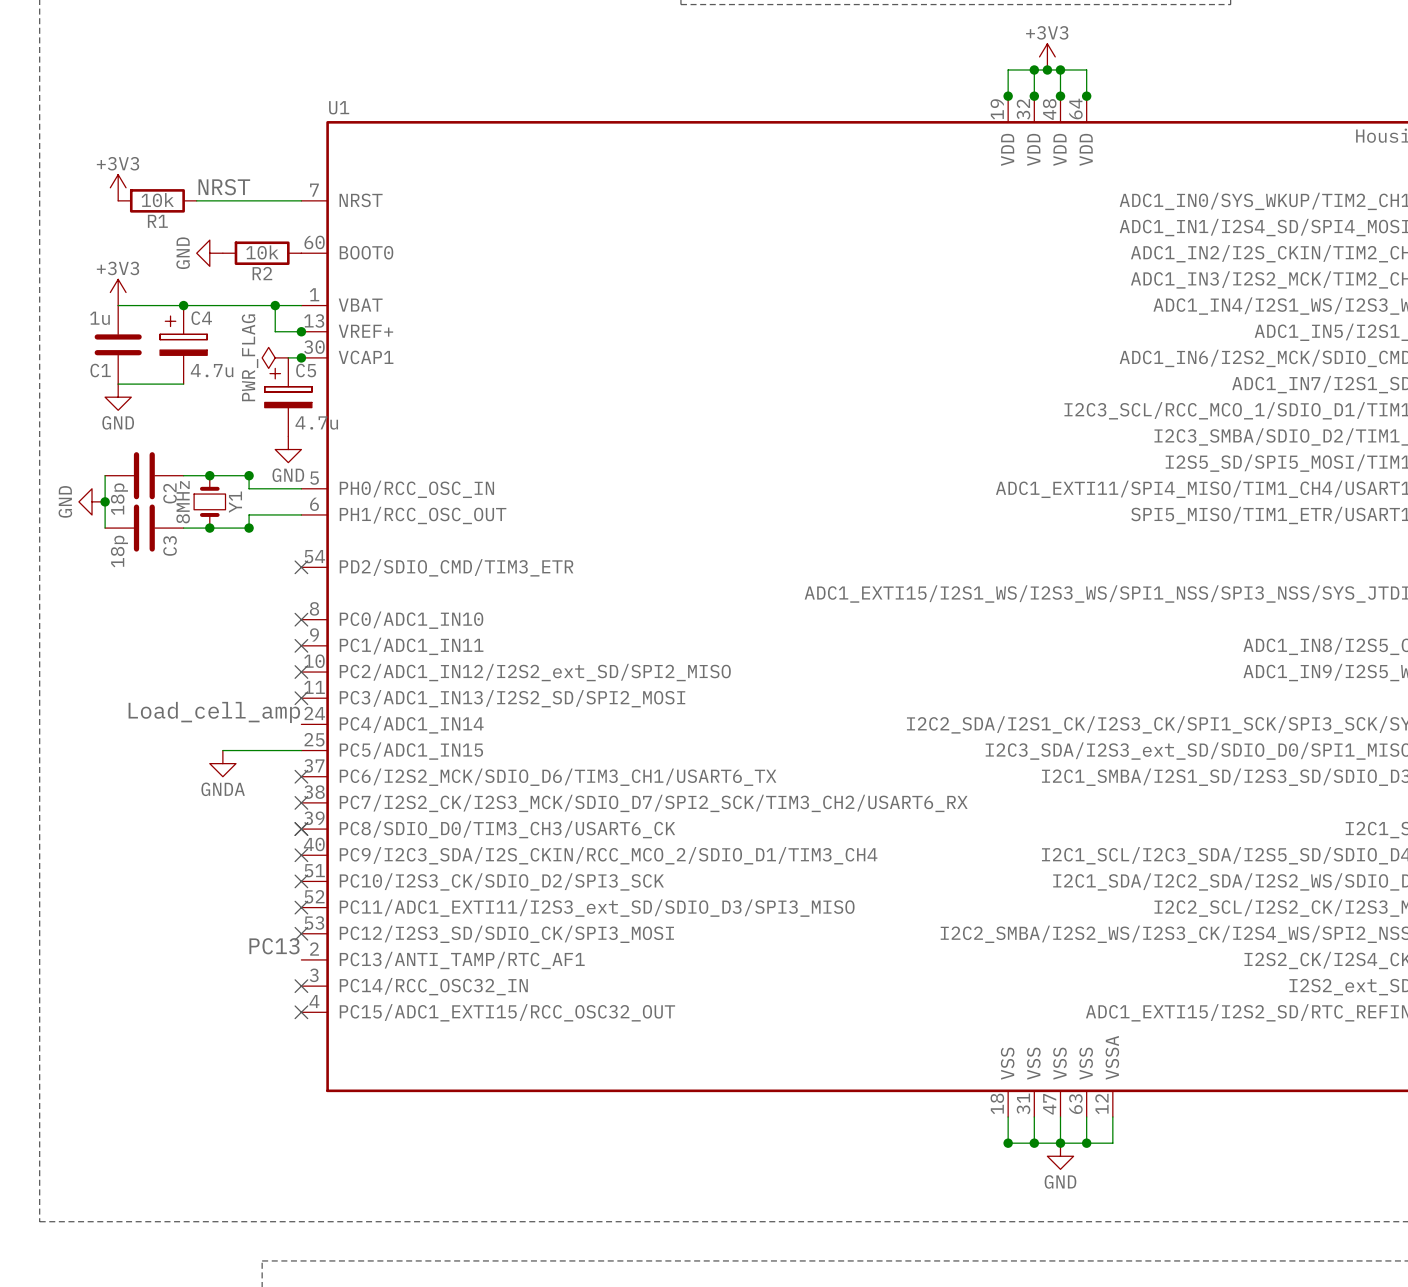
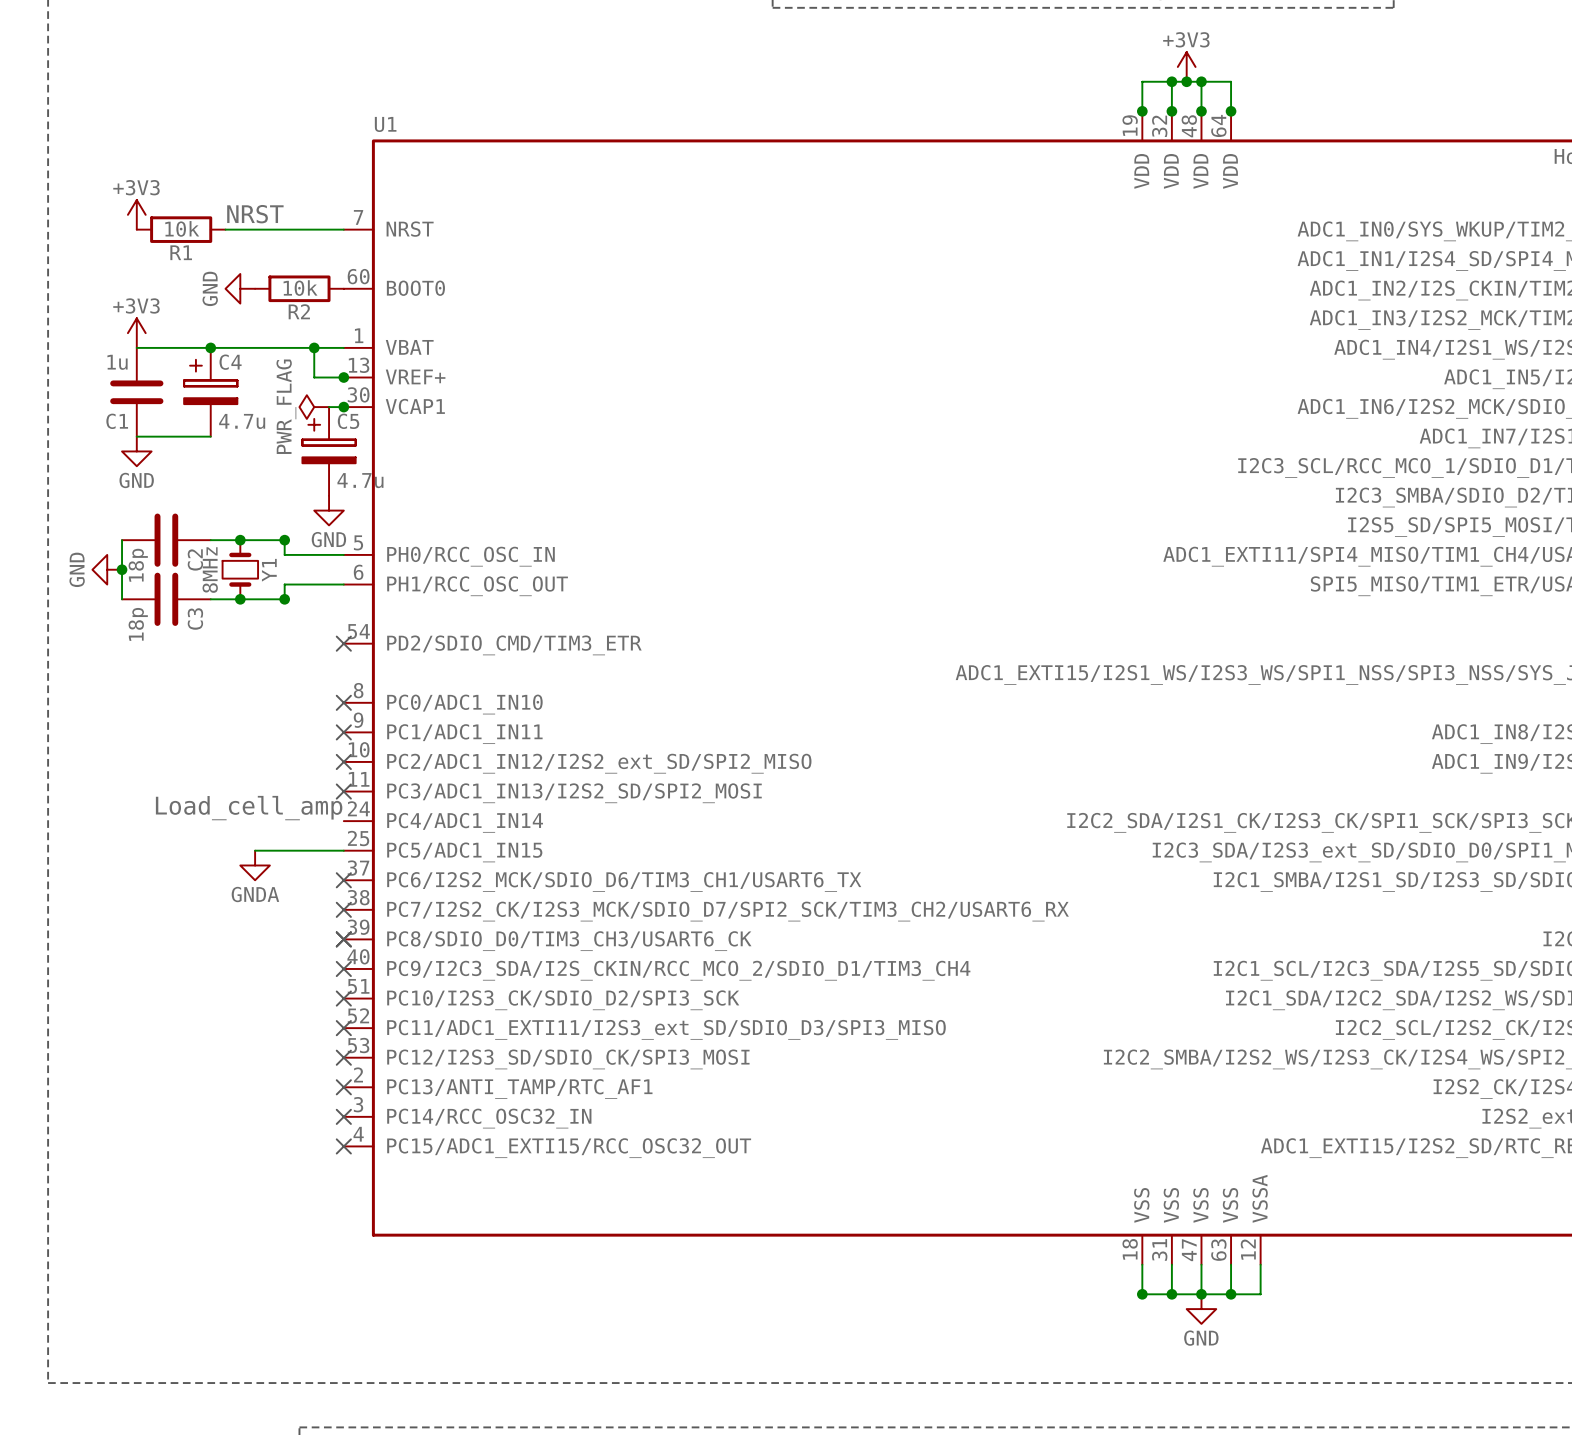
label: PC13 (274, 946) -> none
no-connect mark: none -> (343, 1087)

